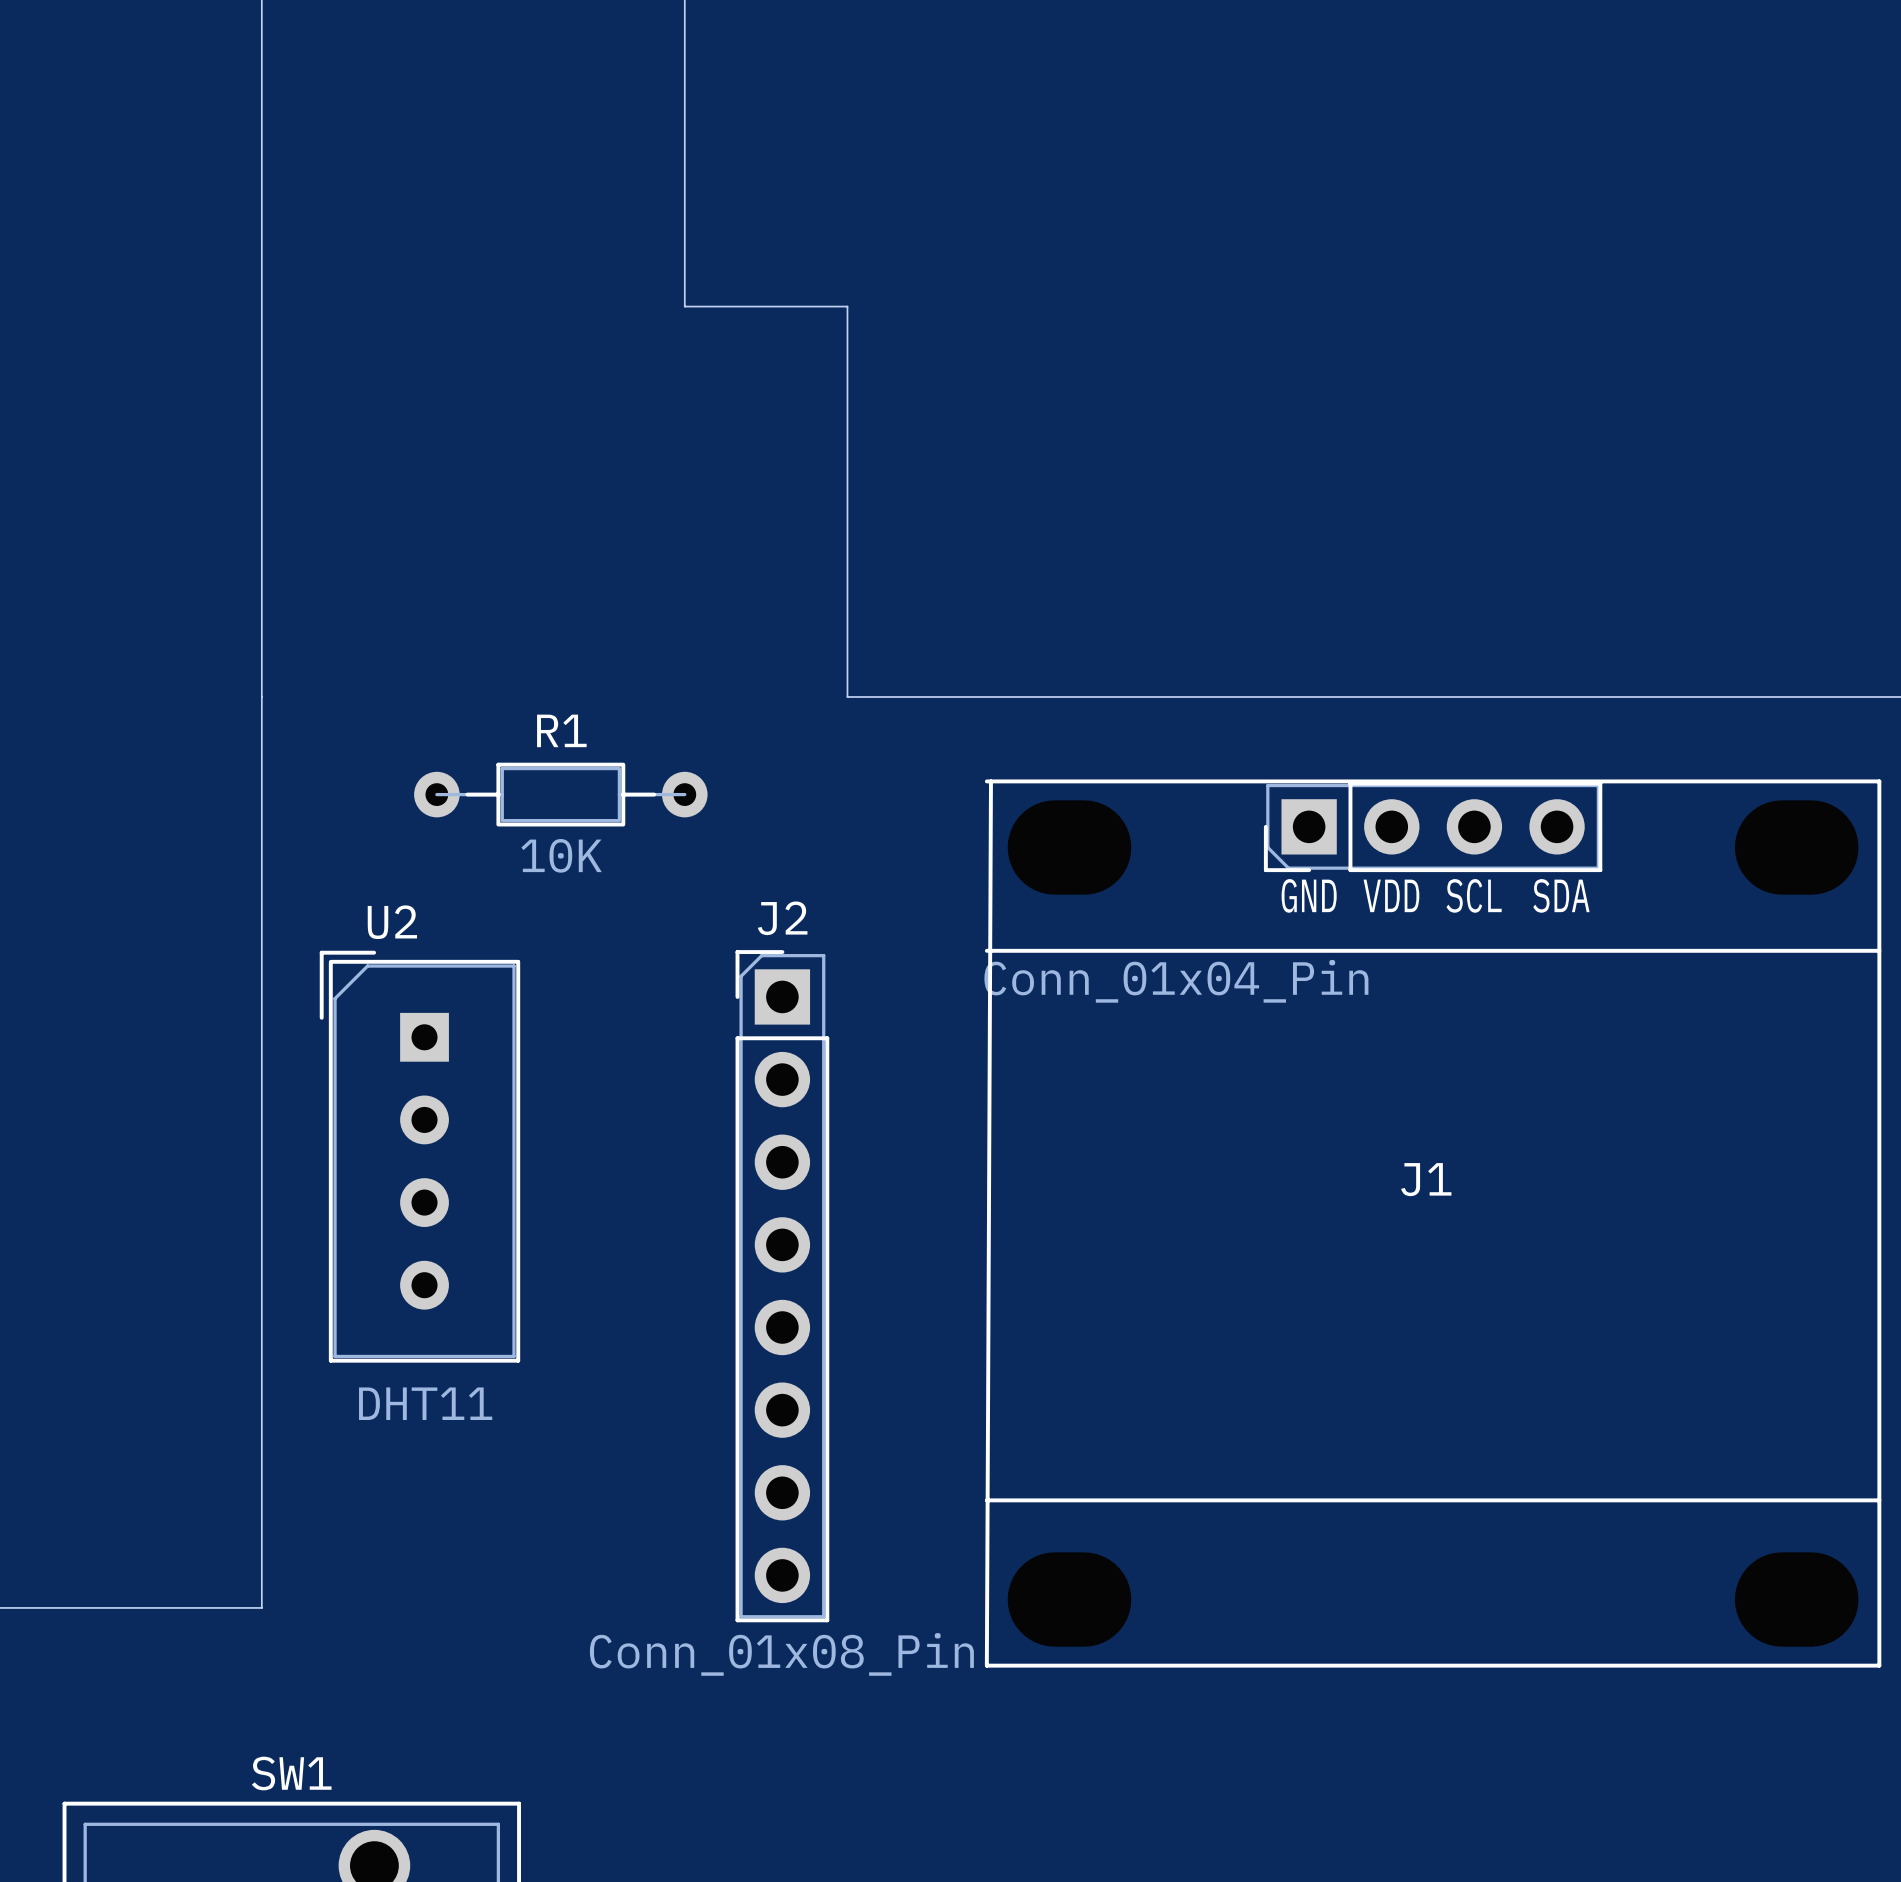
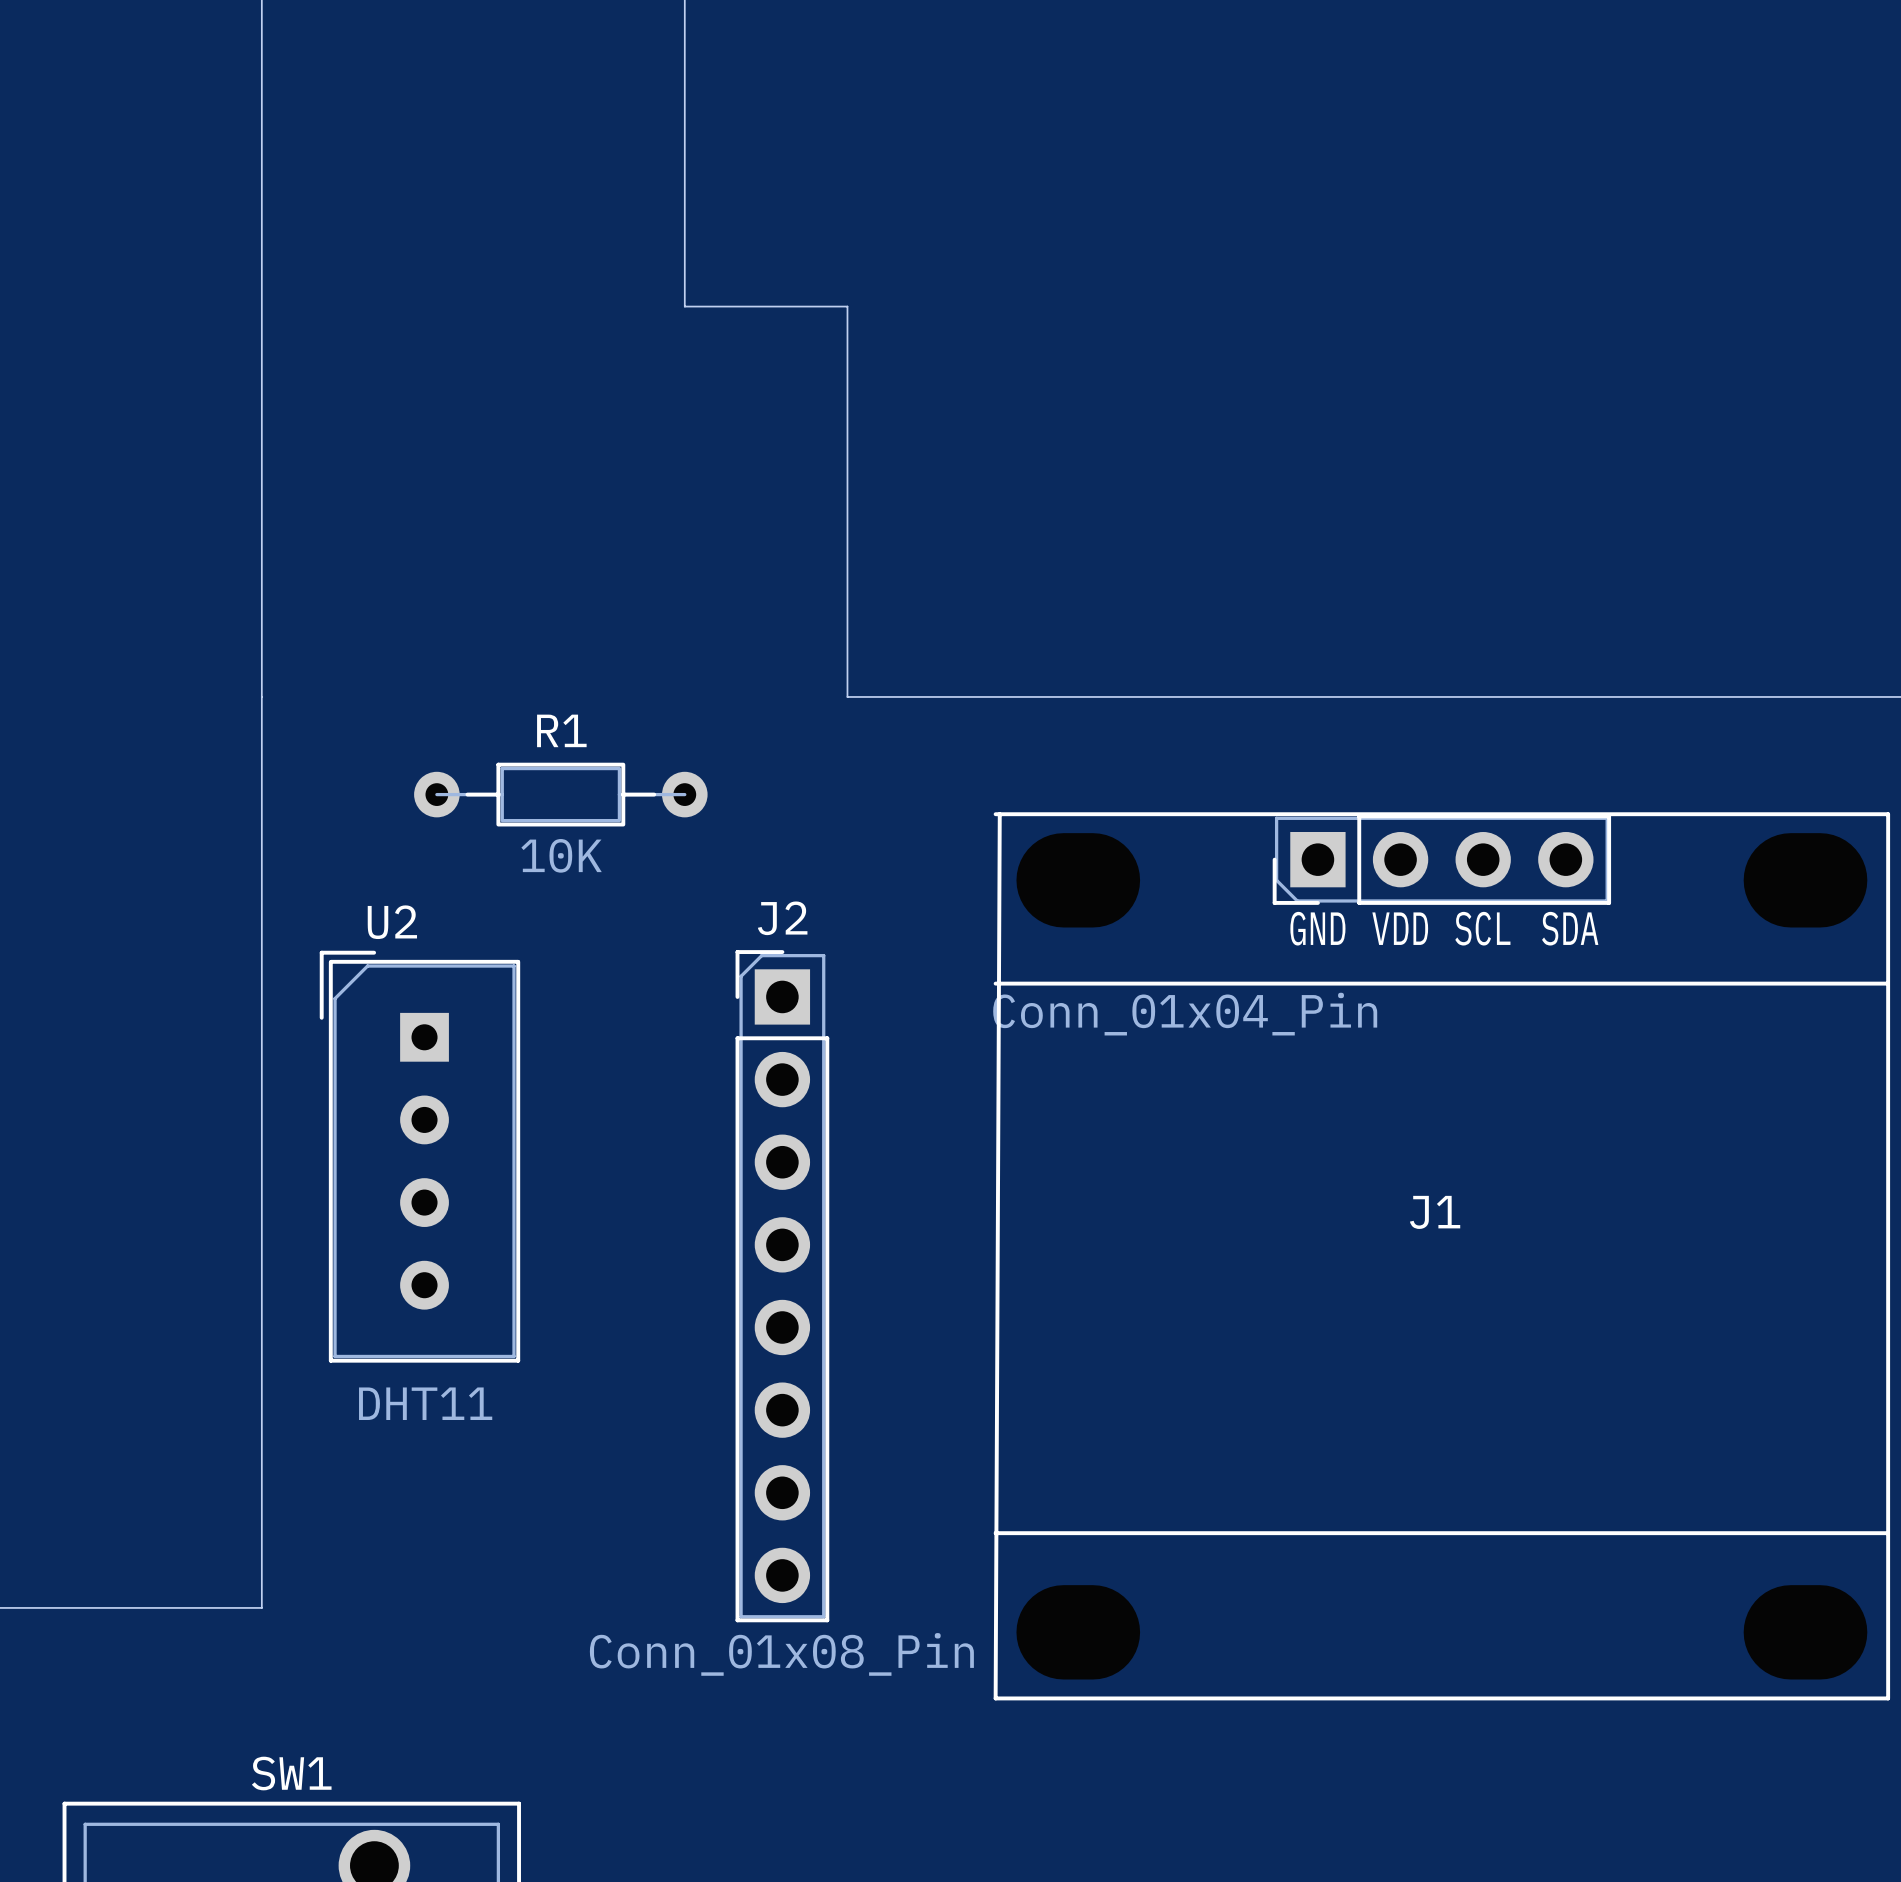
J1 position: (1433, 1223) -> (1441, 1256)

